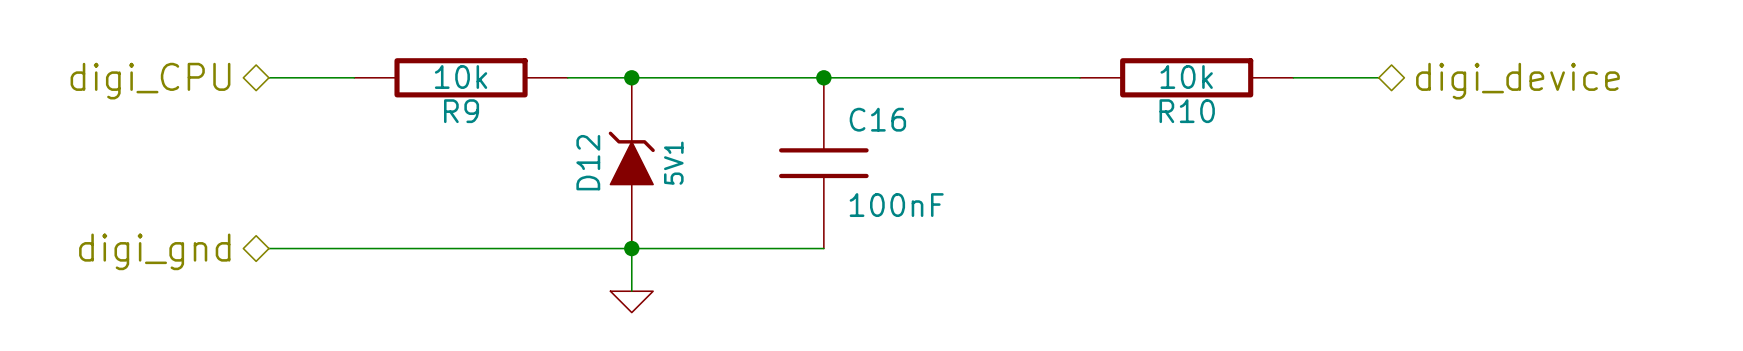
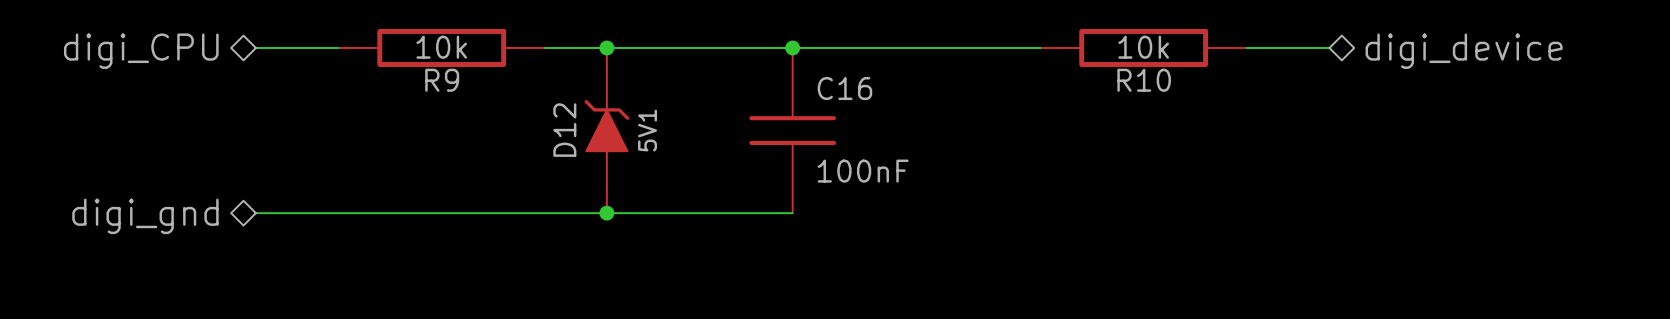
wire: (631, 248) (631, 291) -> none
power symbol: (631, 301) -> none

